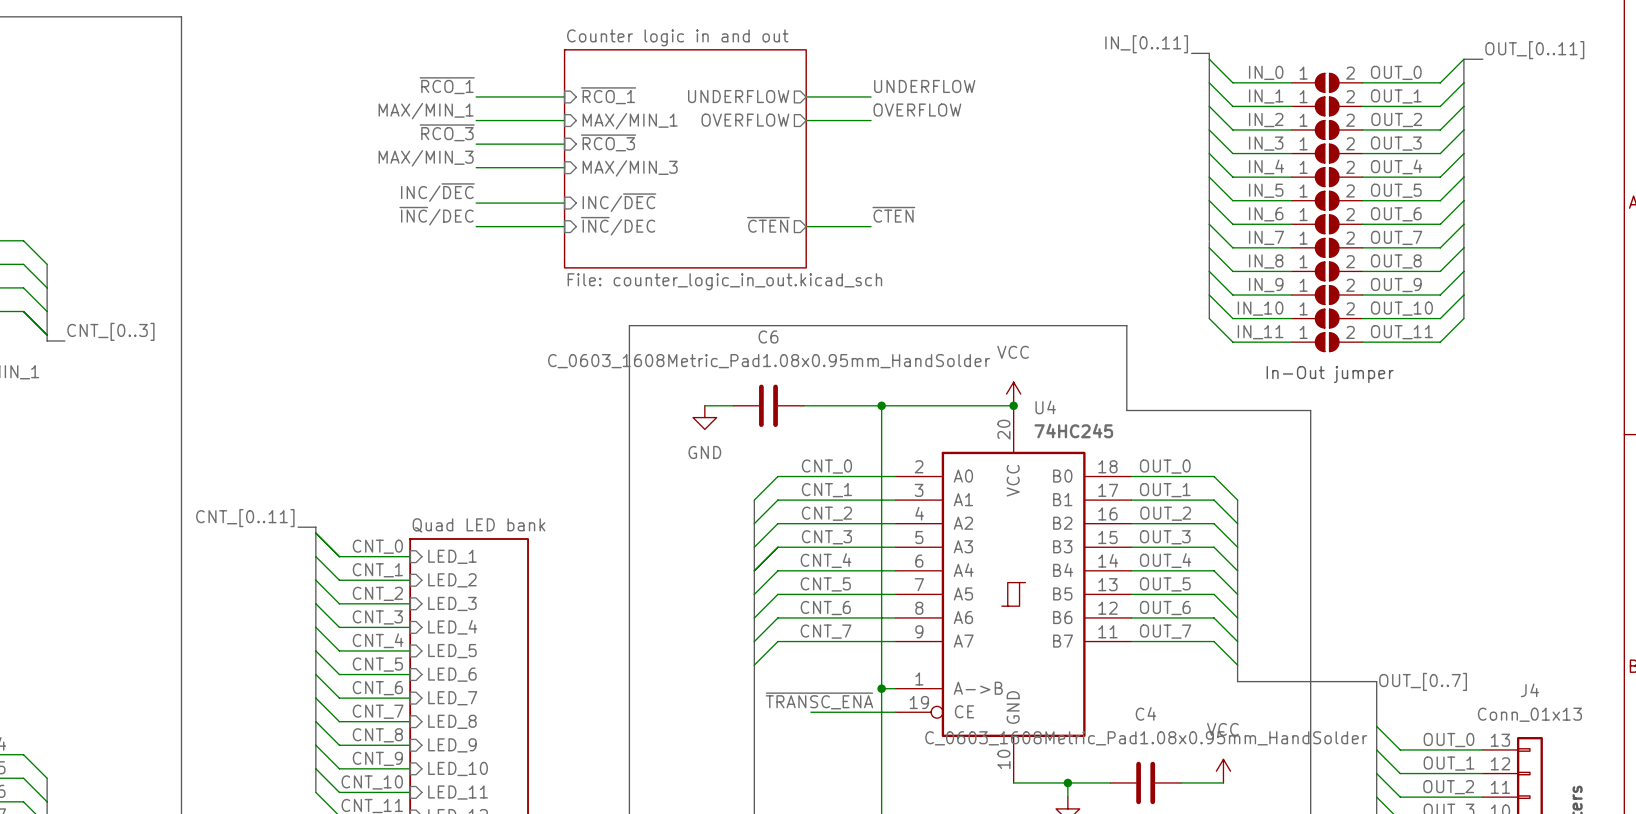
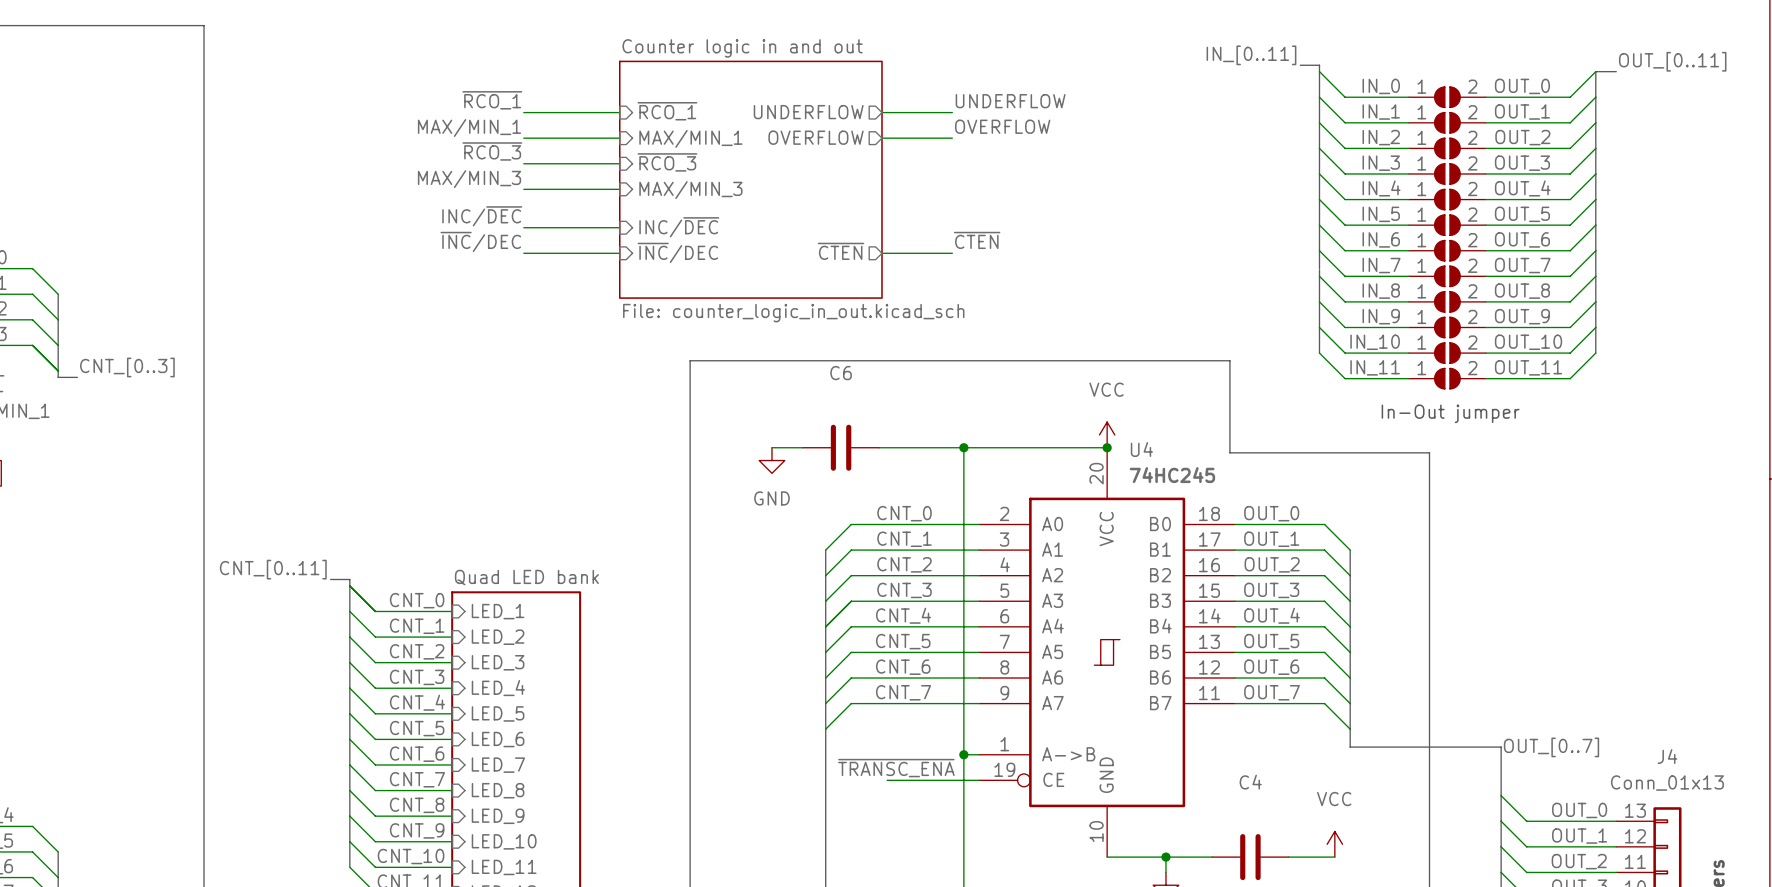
C6 value: C_0603_1608Metric_Pad1.08x0.95mm_HandSolder (769, 361) -> none
C4 value: C_0603_1608Metric_Pad1.08x0.95mm_HandSolder (1146, 738) -> none

